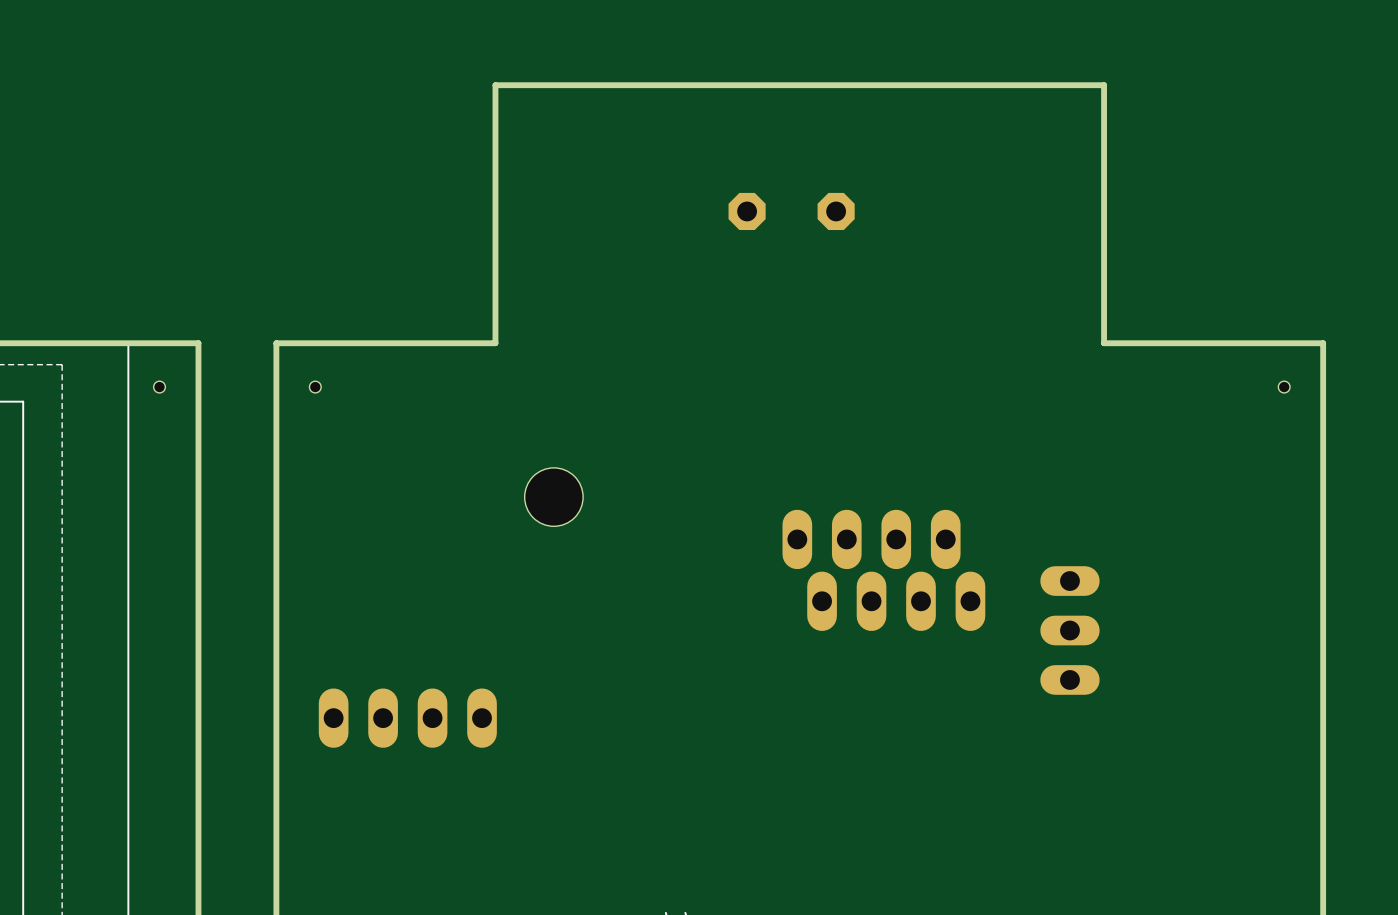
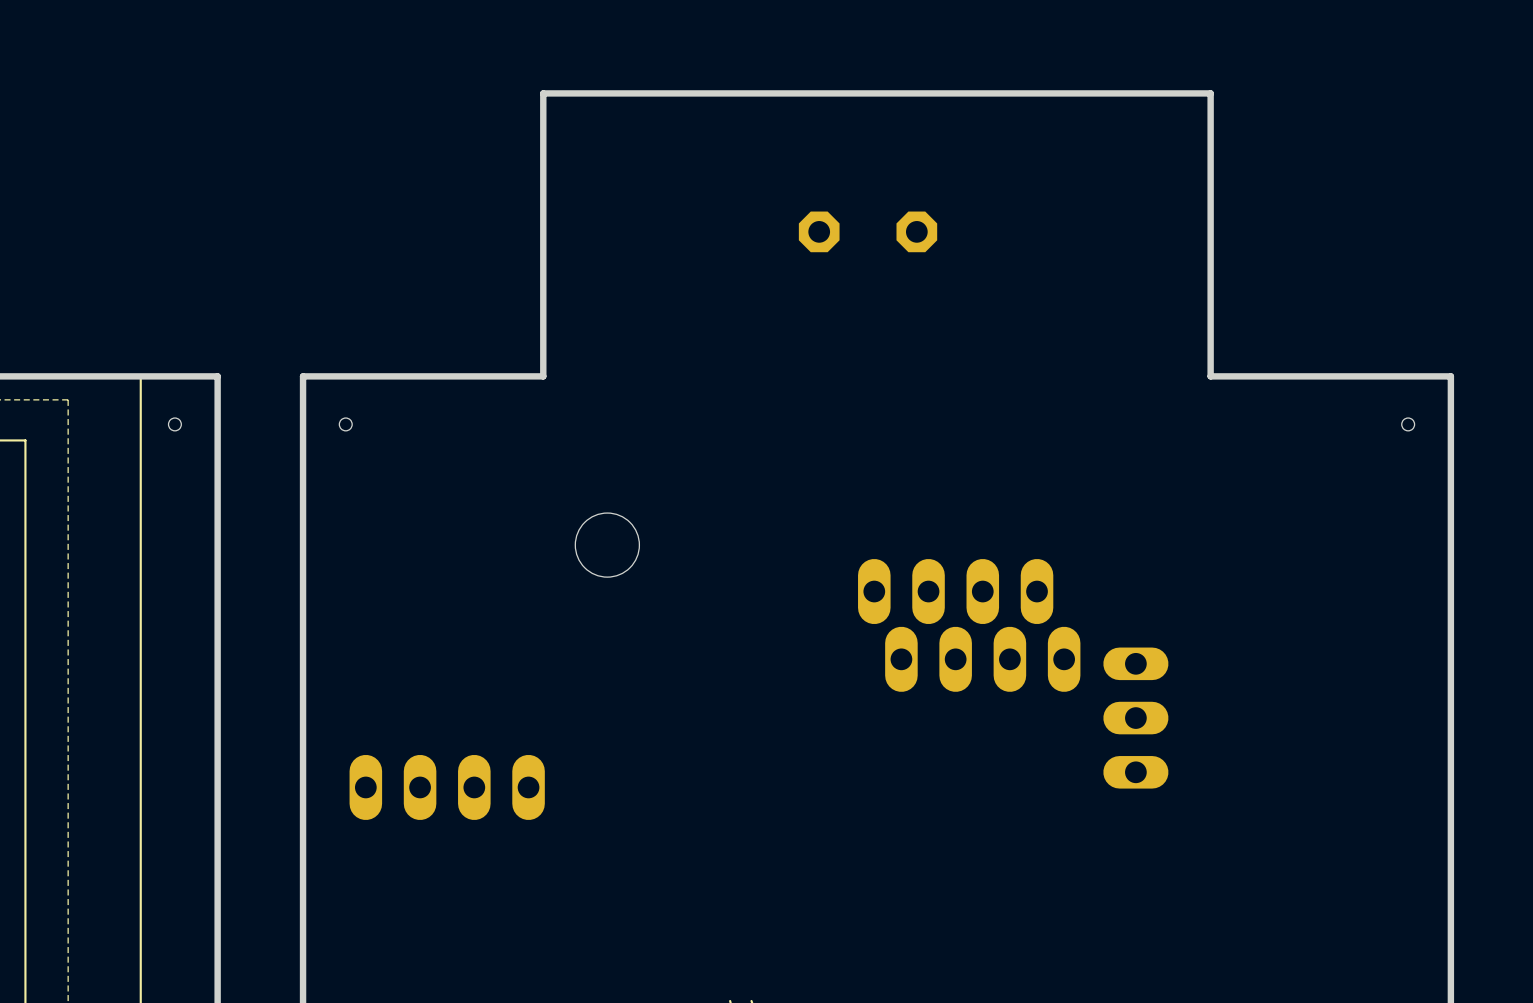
part position: (1069, 630) -> (1135, 718)

